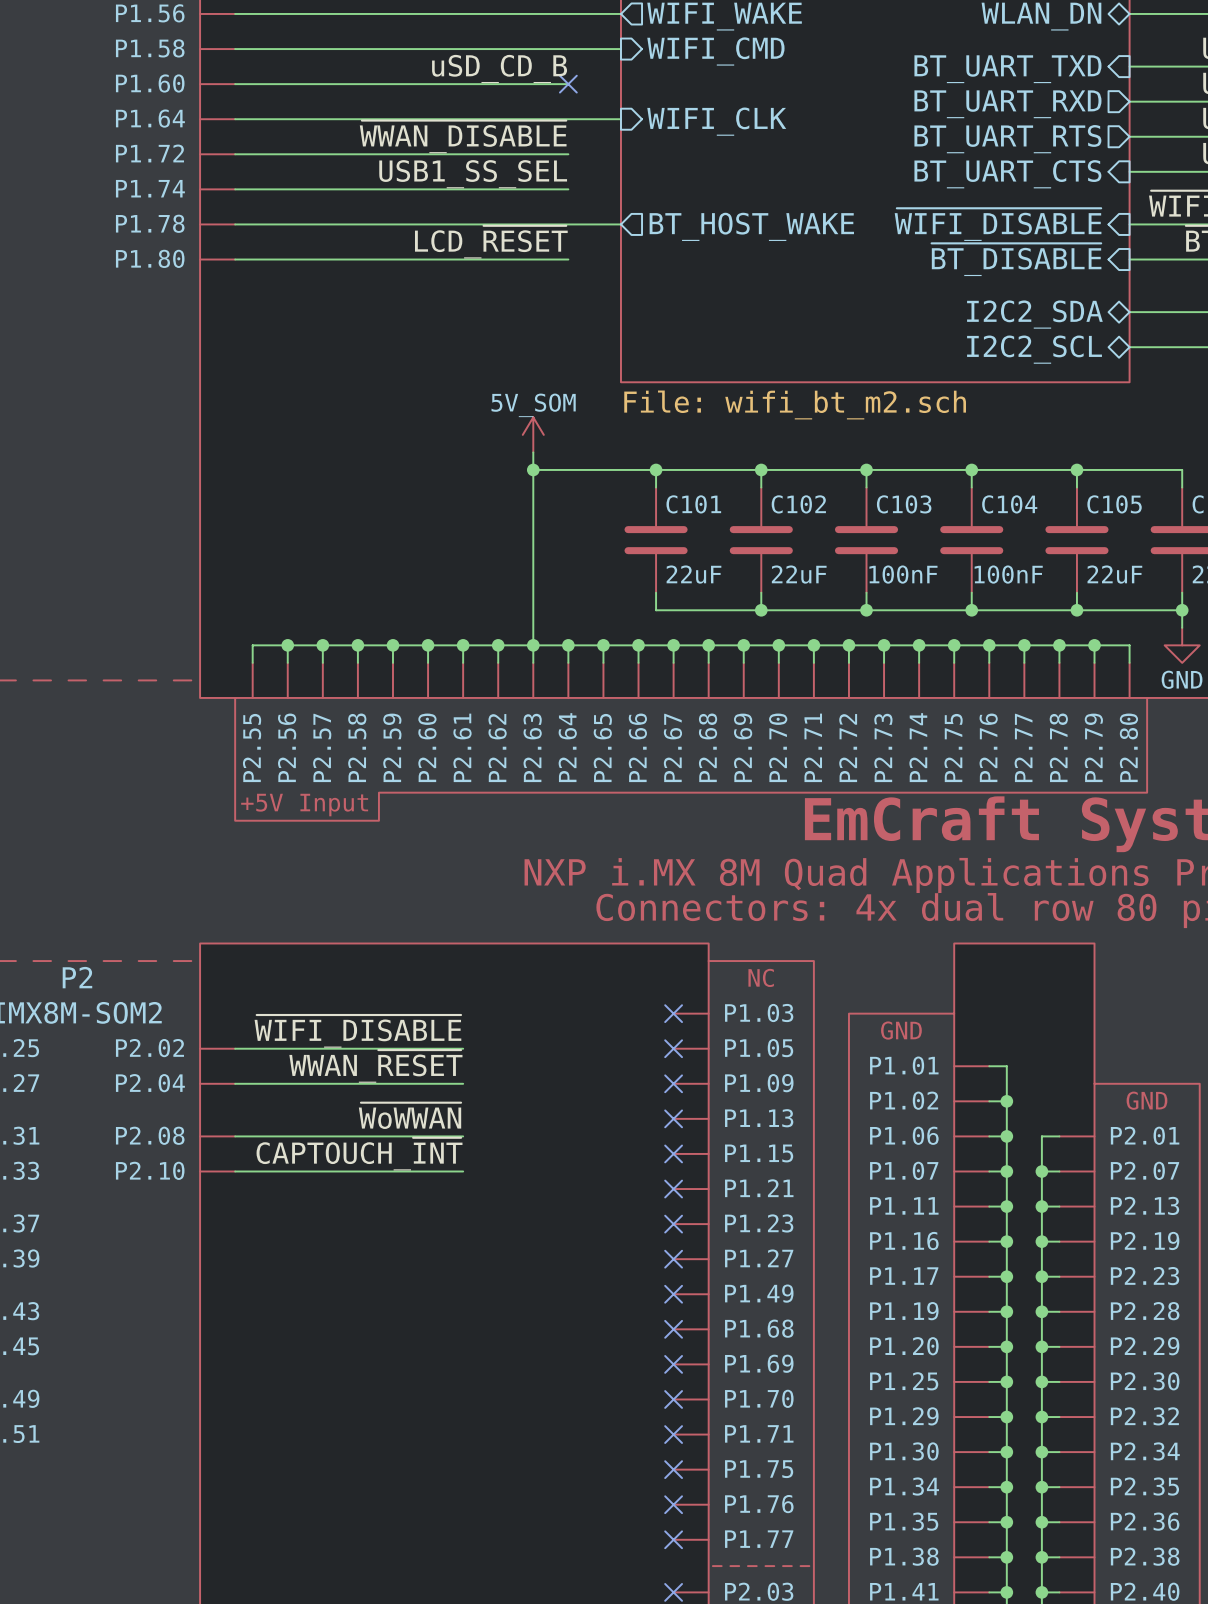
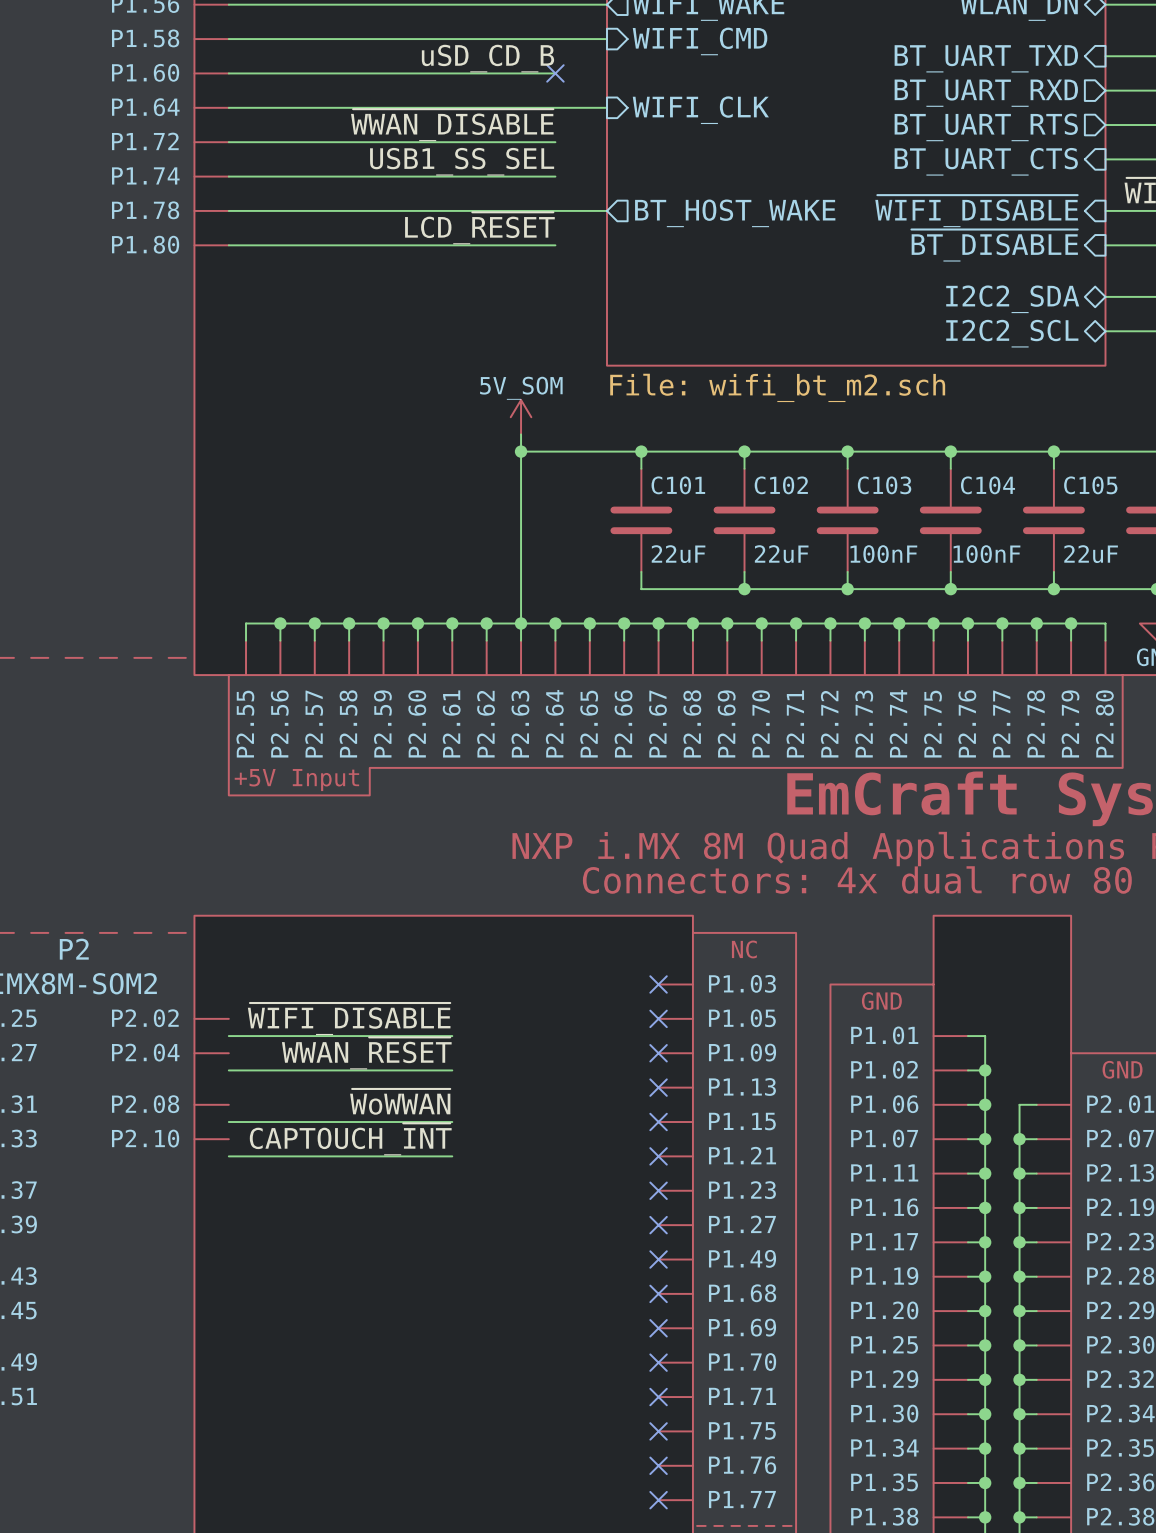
label position: ~{WIFI_DISABLE} (357, 1031) -> ~{WIFI_DISABLE} (349, 1019)
wire: (235, 1048) (463, 1048) -> (228, 1036) (452, 1036)
label position: WWAN_~{RESET} (375, 1066) -> WWAN_~{RESET} (366, 1053)
wire: (235, 1083) (463, 1083) -> (228, 1070) (452, 1070)
label position: ~{WoWWAN} (410, 1115) -> ~{WoWWAN} (400, 1101)
wire: (235, 1136) (463, 1136) -> (228, 1122) (452, 1122)
label position: CAPTOUCH_~{INT} (359, 1154) -> CAPTOUCH_~{INT} (350, 1139)
wire: (235, 1171) (463, 1171) -> (228, 1156) (452, 1156)

